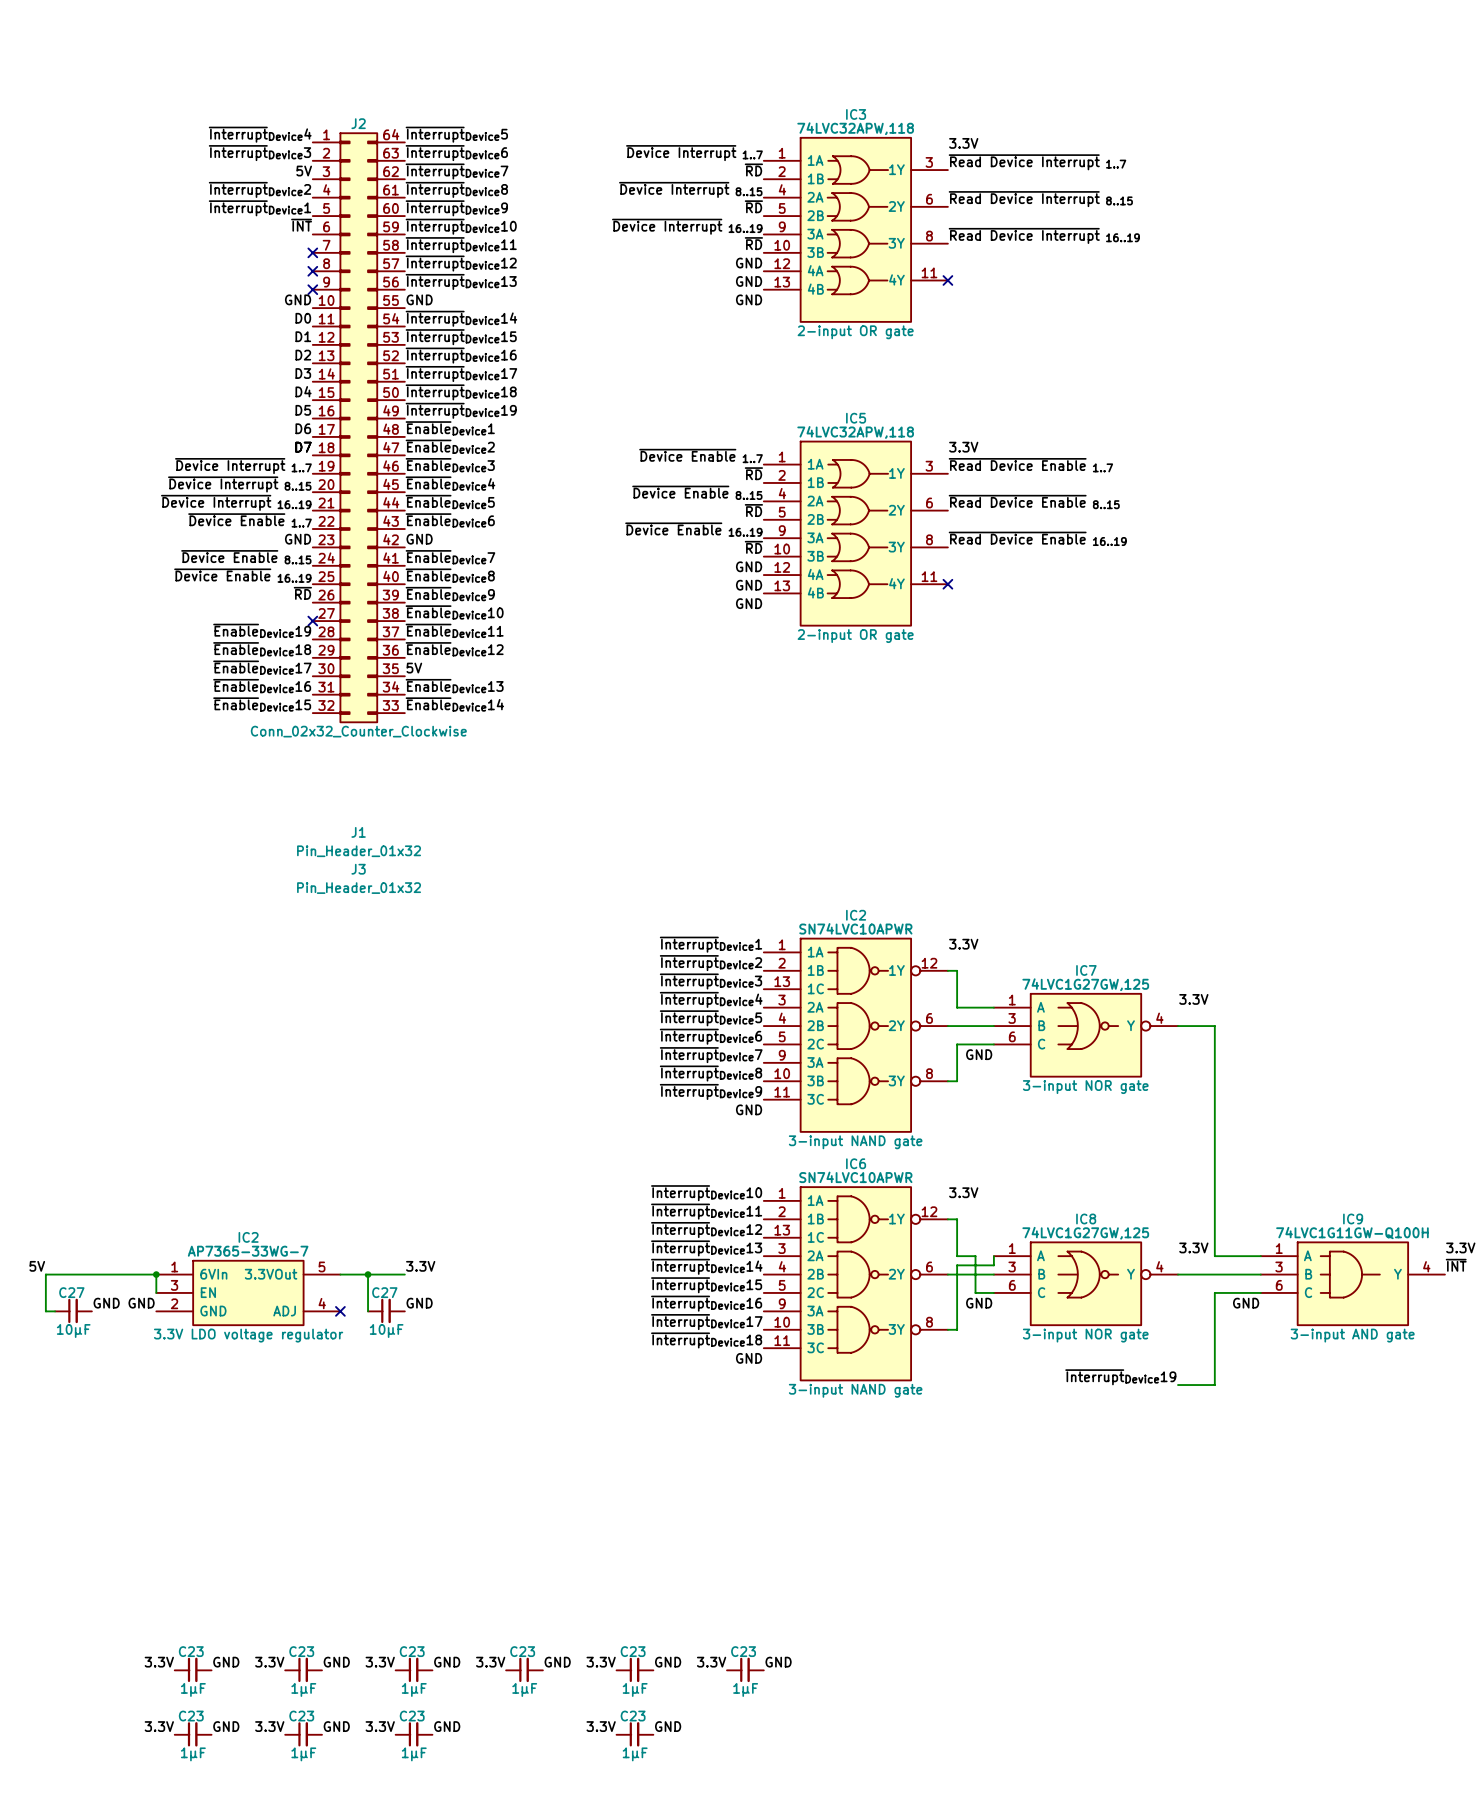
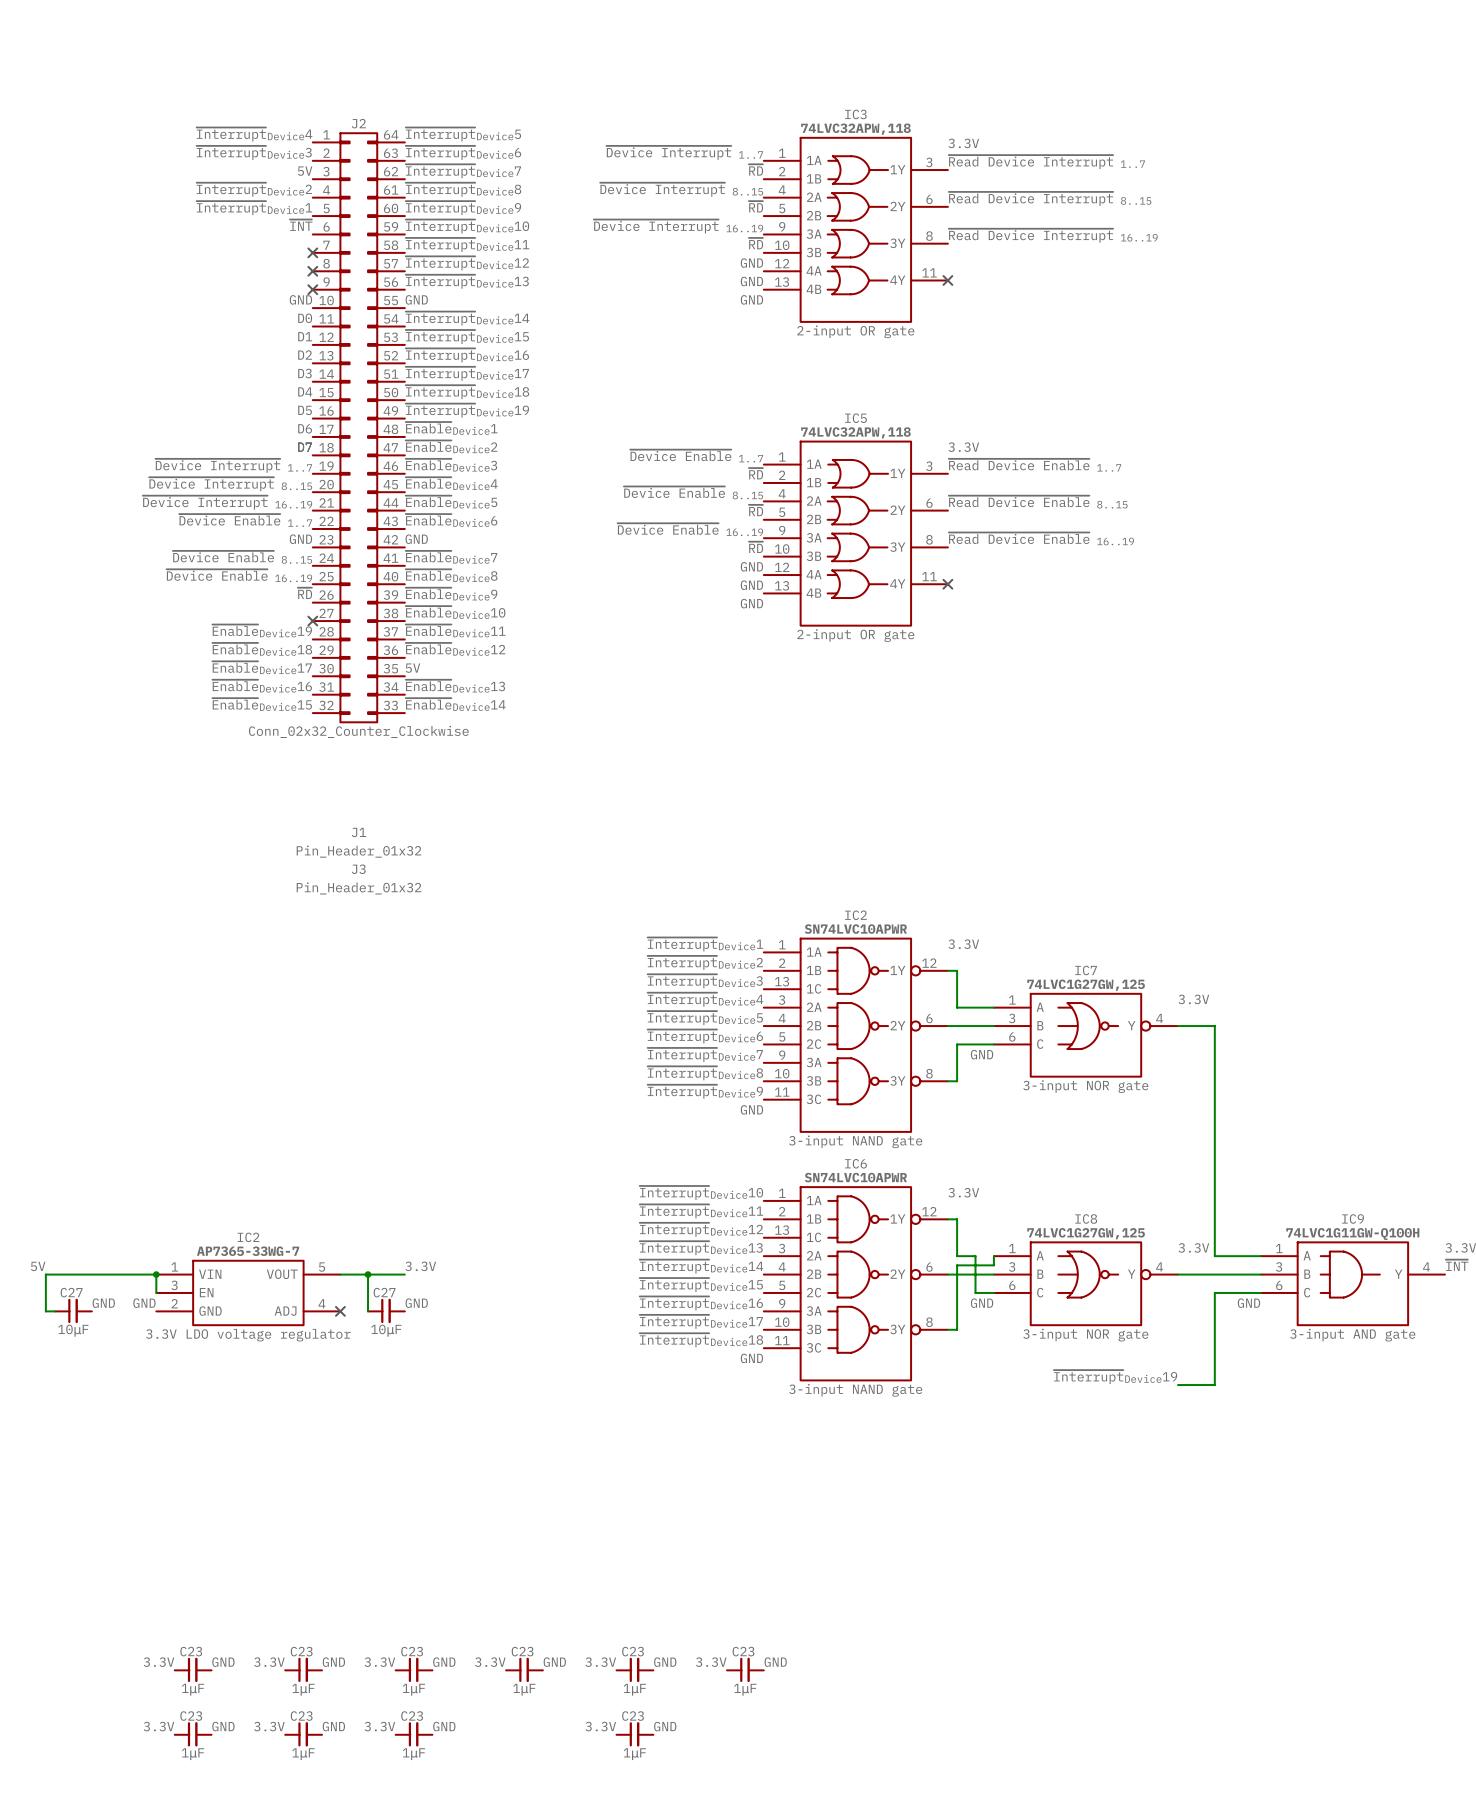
IC2 pin name: 6VIn (213, 1274) -> VIN (210, 1274)
IC2 pin name: 3.3VOut (271, 1274) -> VOUT (282, 1274)

